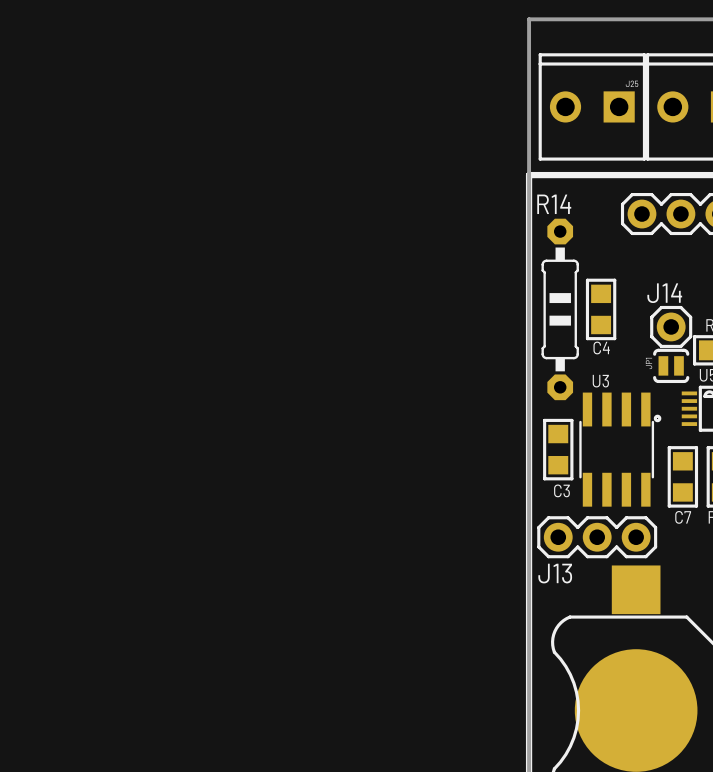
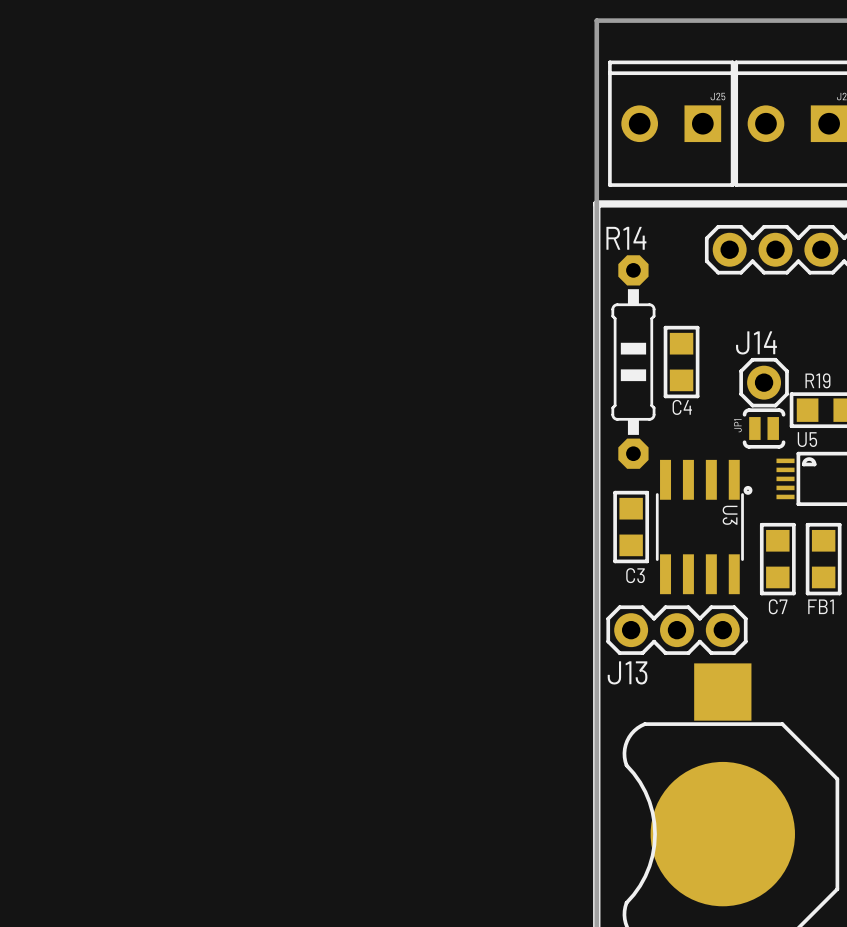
U3 name rotation: 0° (600, 381) -> 90° clockwise (730, 515)
U3 name position: U3 (600, 381) -> U3 (730, 515)

